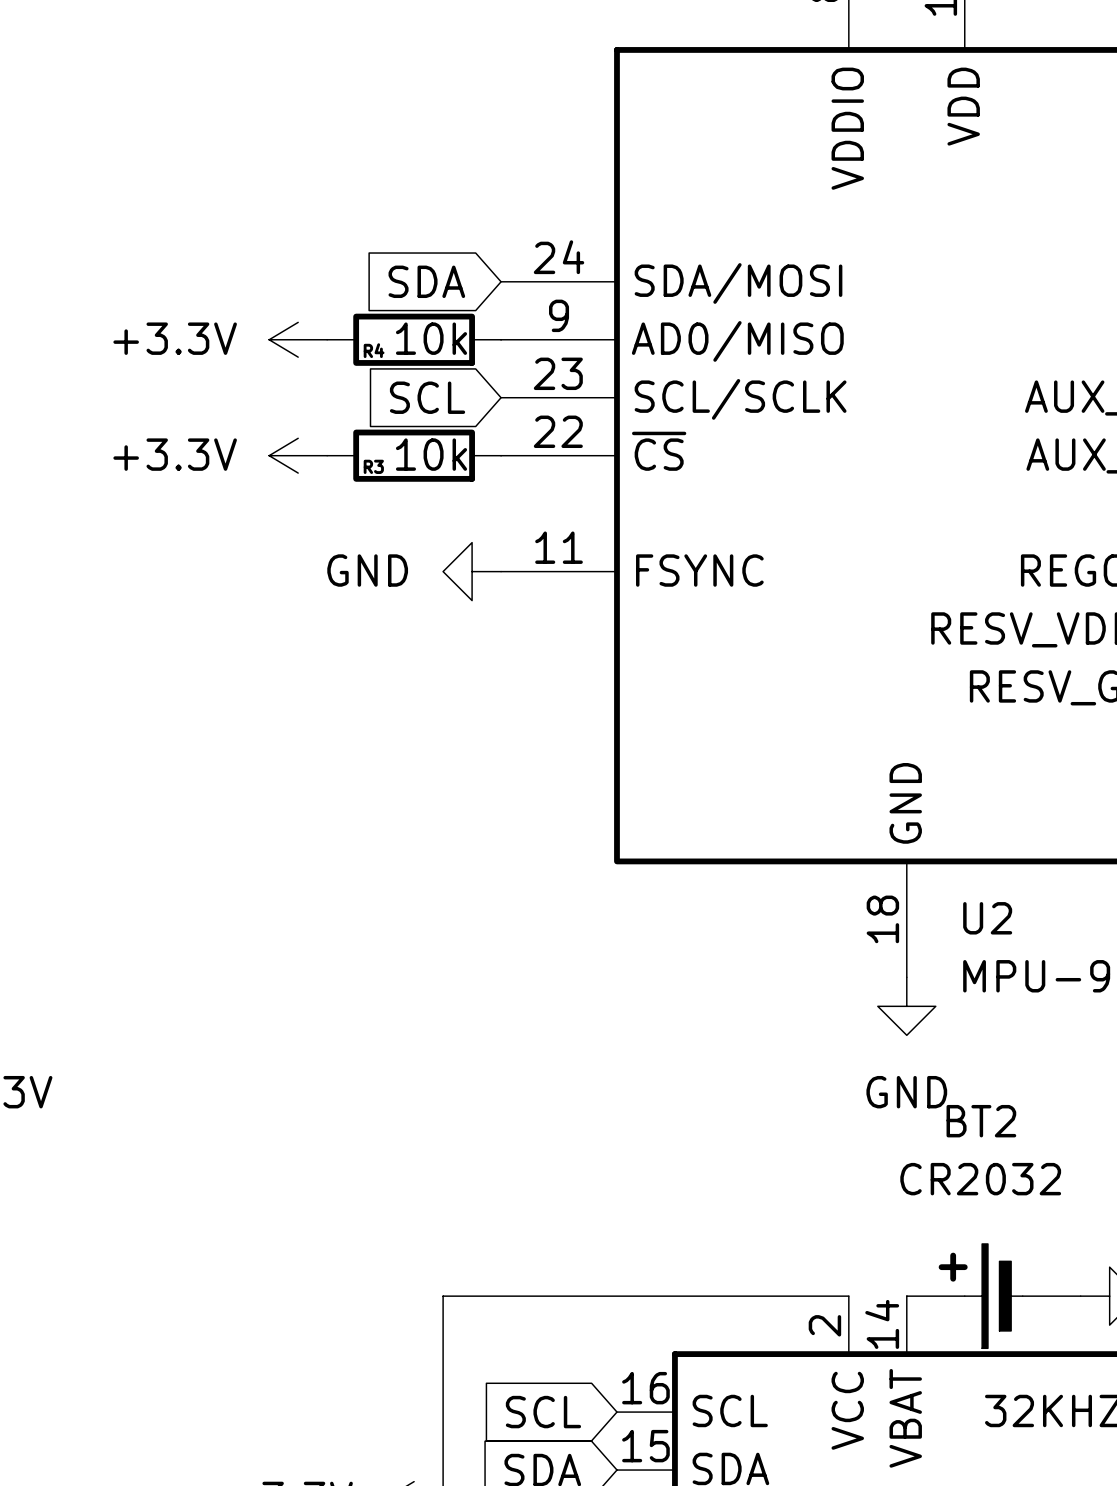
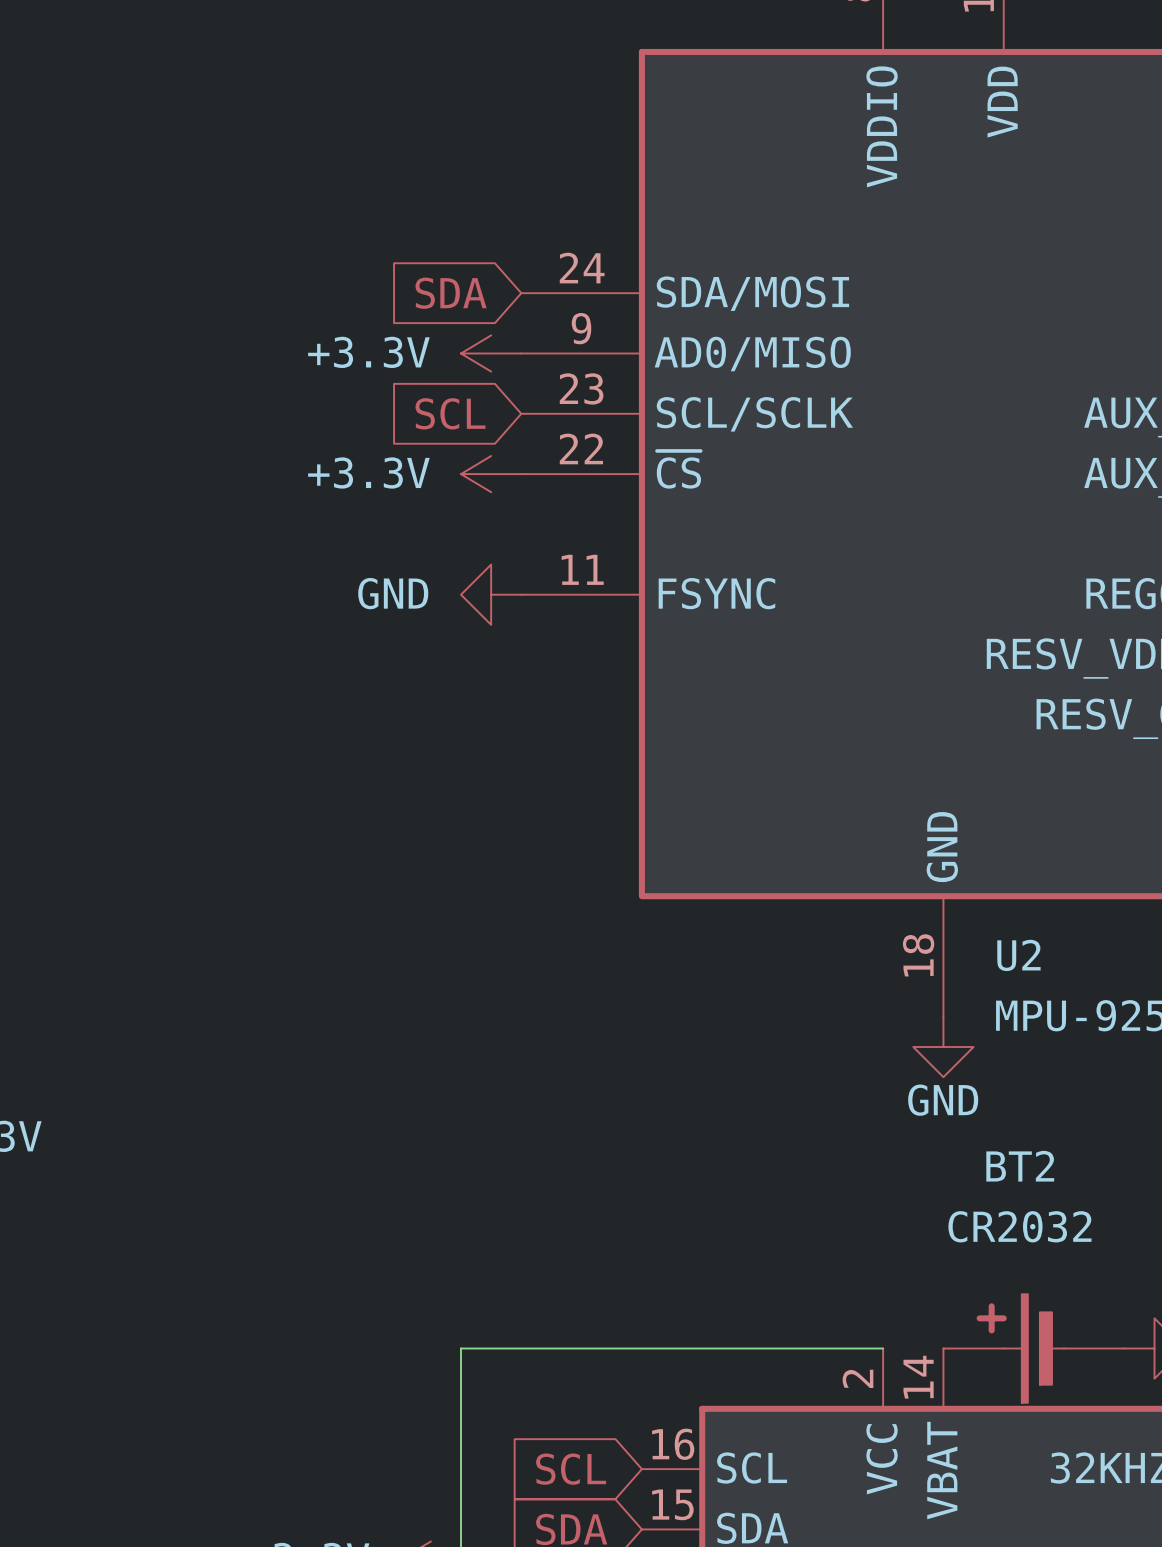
power symbol: +3.3V (298, 339) -> none
R4: 10k (414, 339) -> none
power symbol: none -> +3.3V (491, 353)
power symbol: +3.3V (298, 455) -> none
R3: 10k (414, 455) -> none
power symbol: none -> +3.3V (491, 474)
power symbol text position: GND (906, 1092) -> GND (943, 1100)

